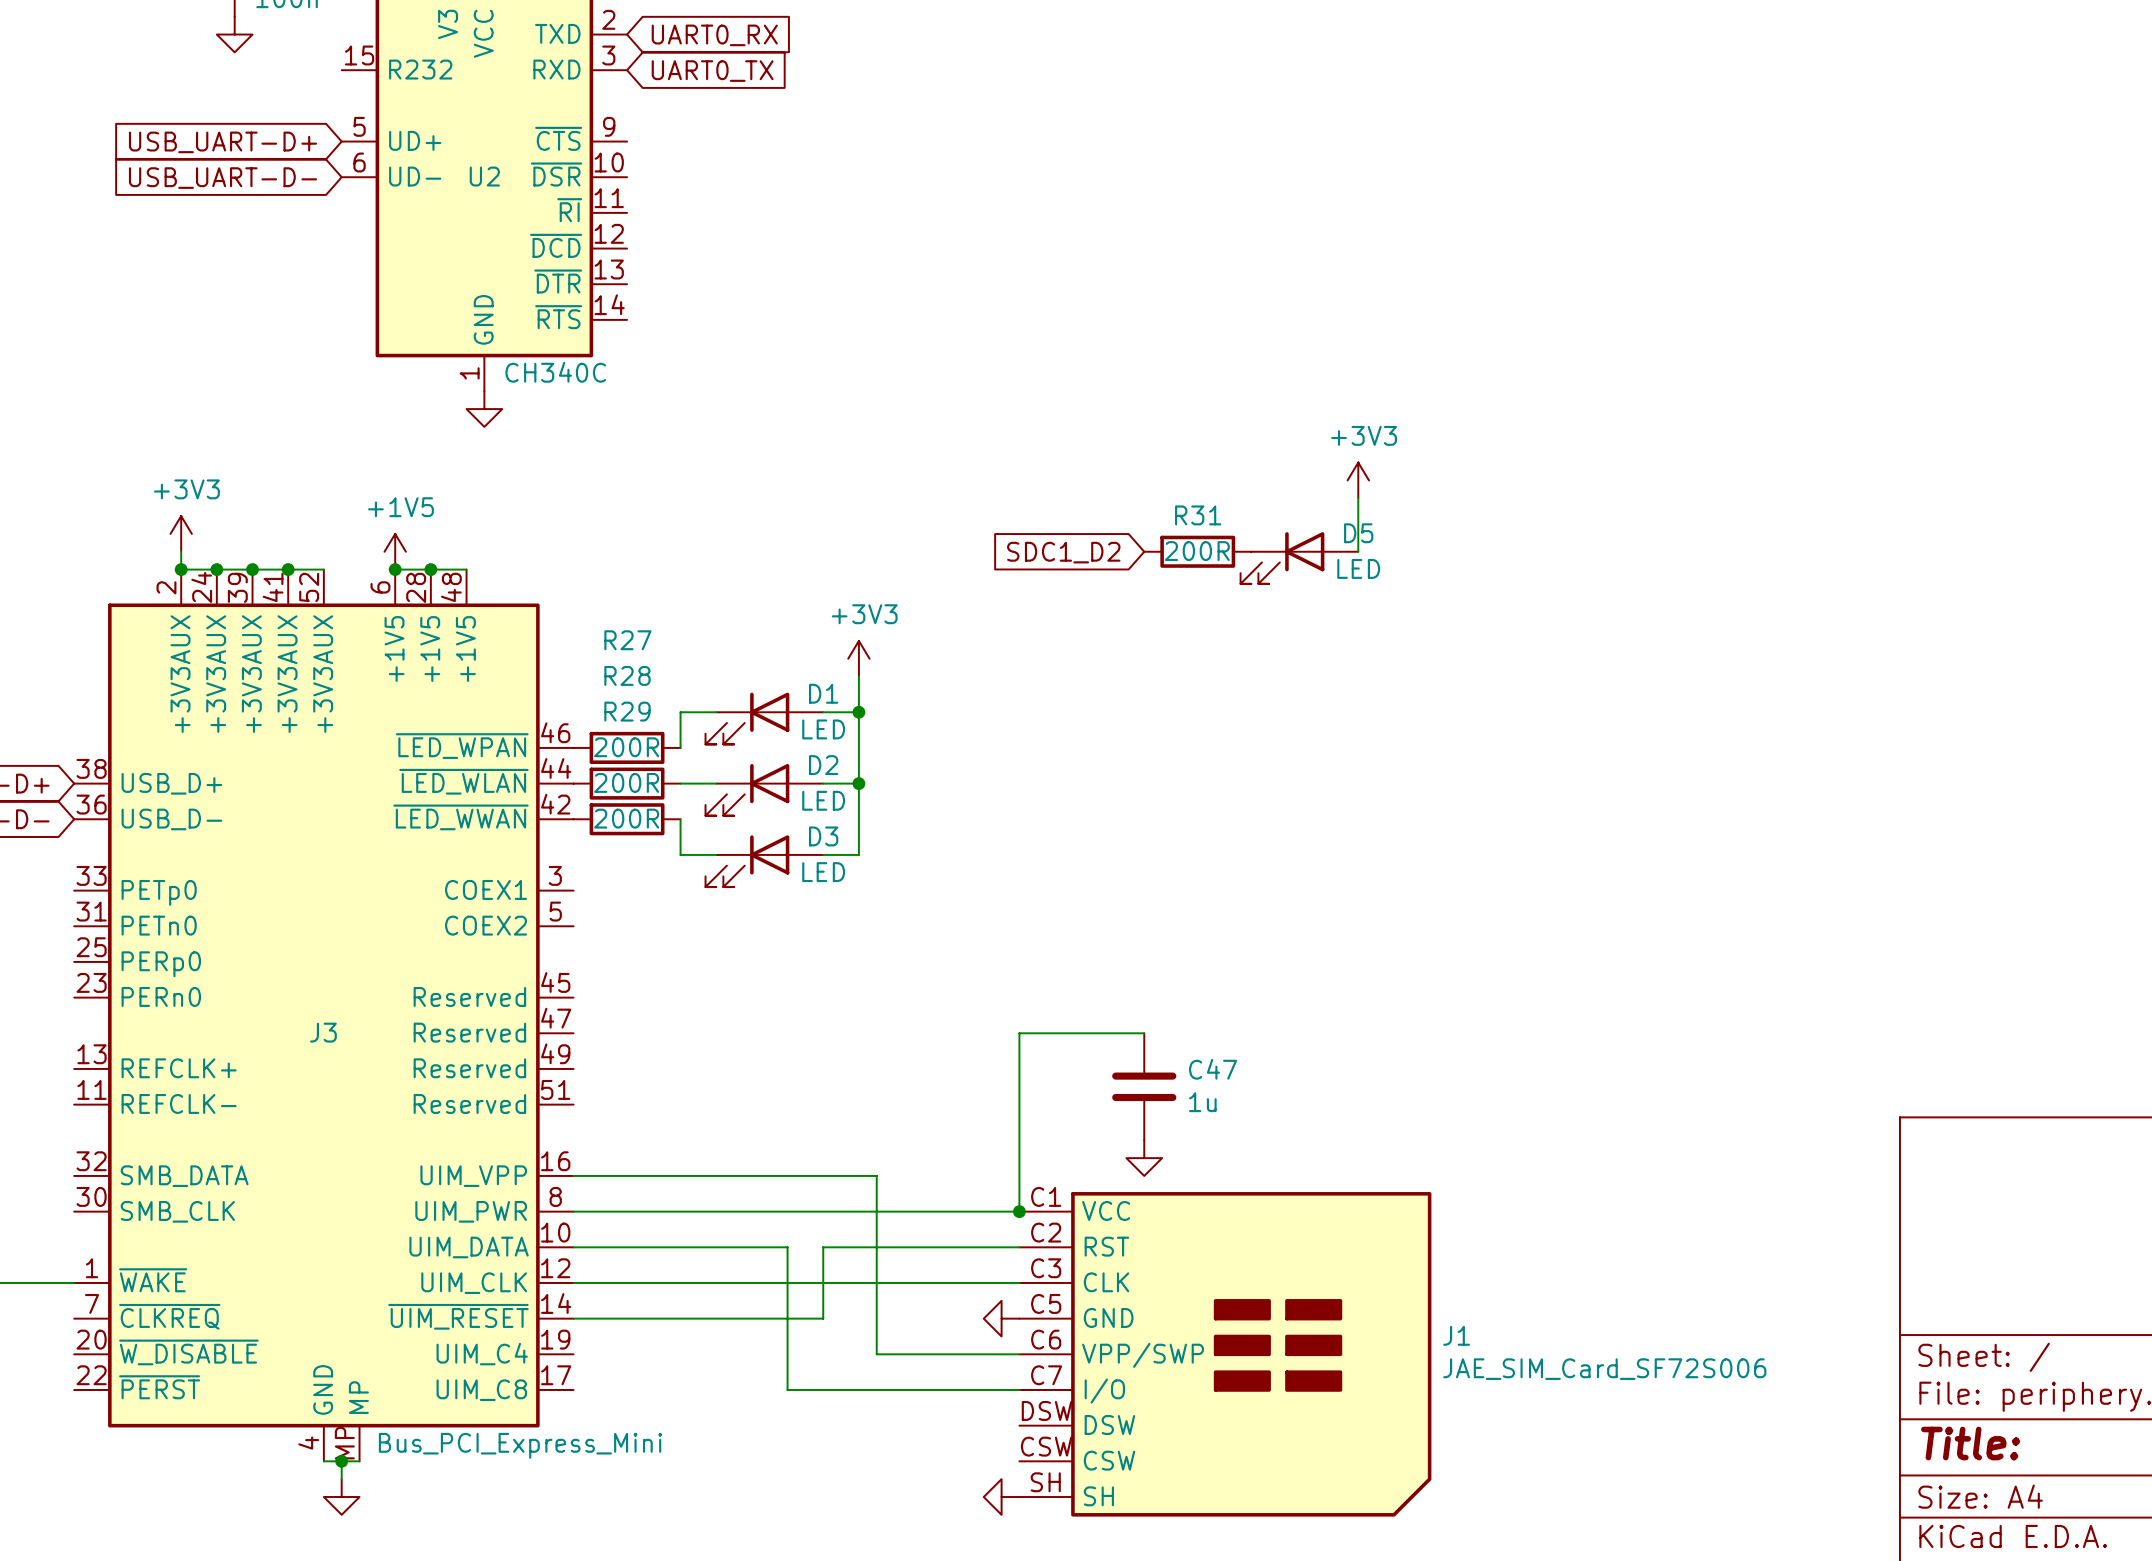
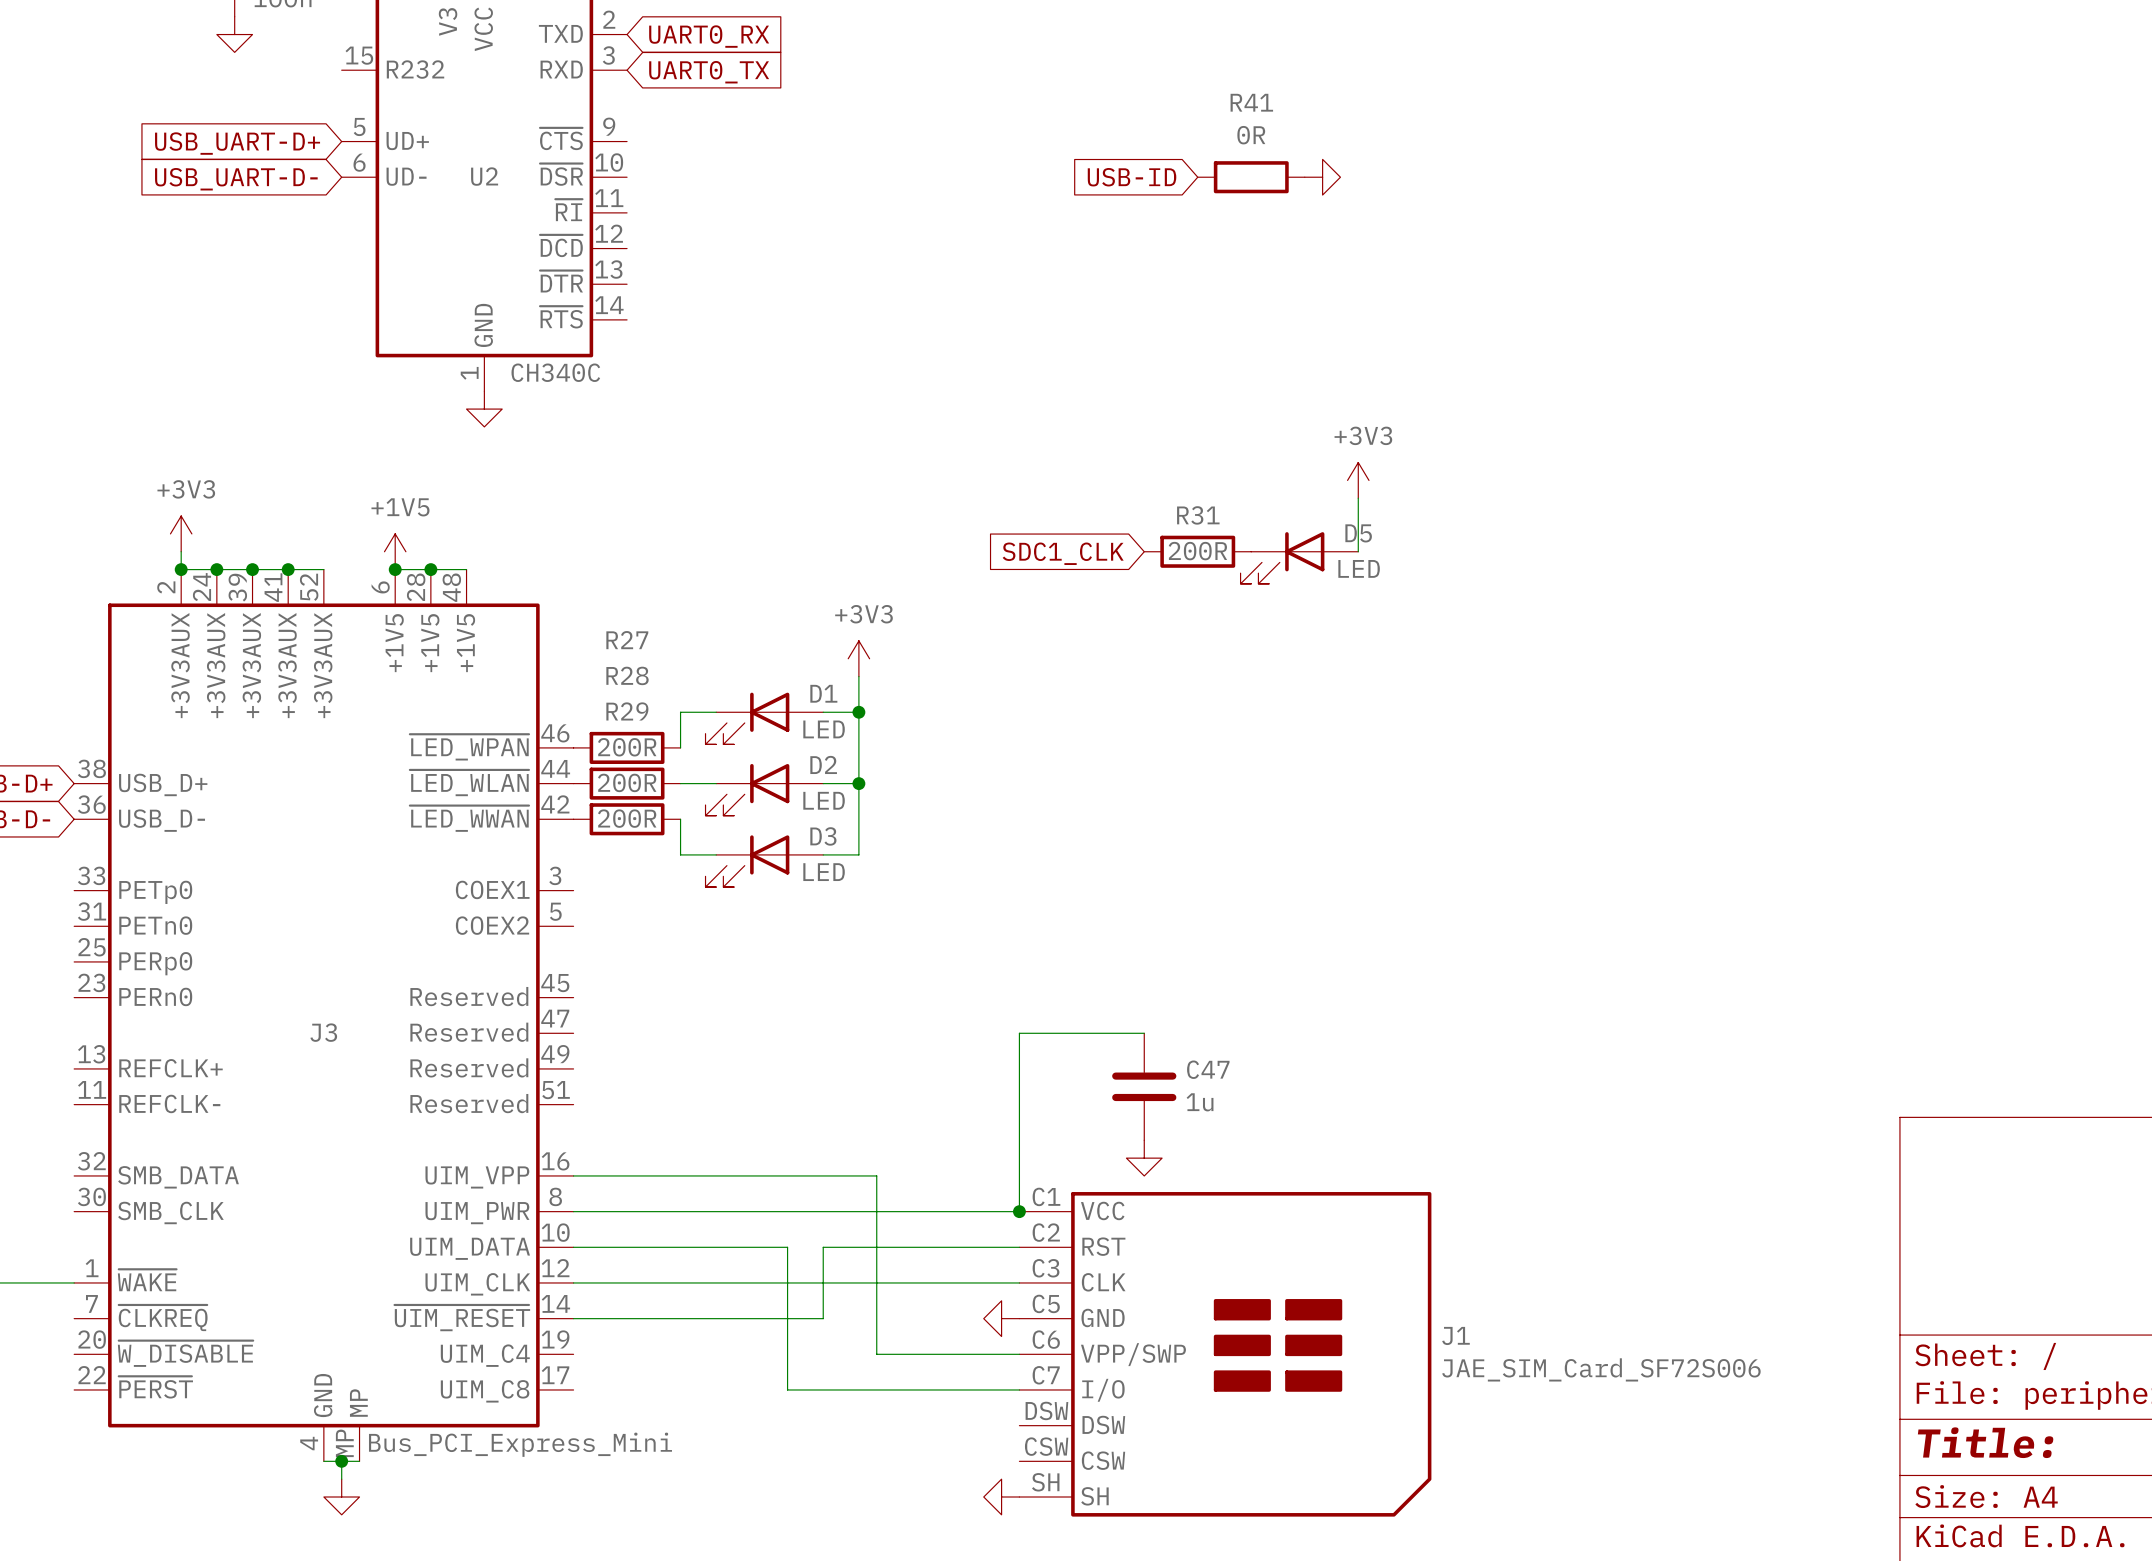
global label: none -> USB-ID (1132, 177)
R41: none -> 0R (1251, 177)
power symbol: none -> (1322, 177)
global label: SDC1_D2 (1063, 552) -> SDC1_CLK (1063, 553)

